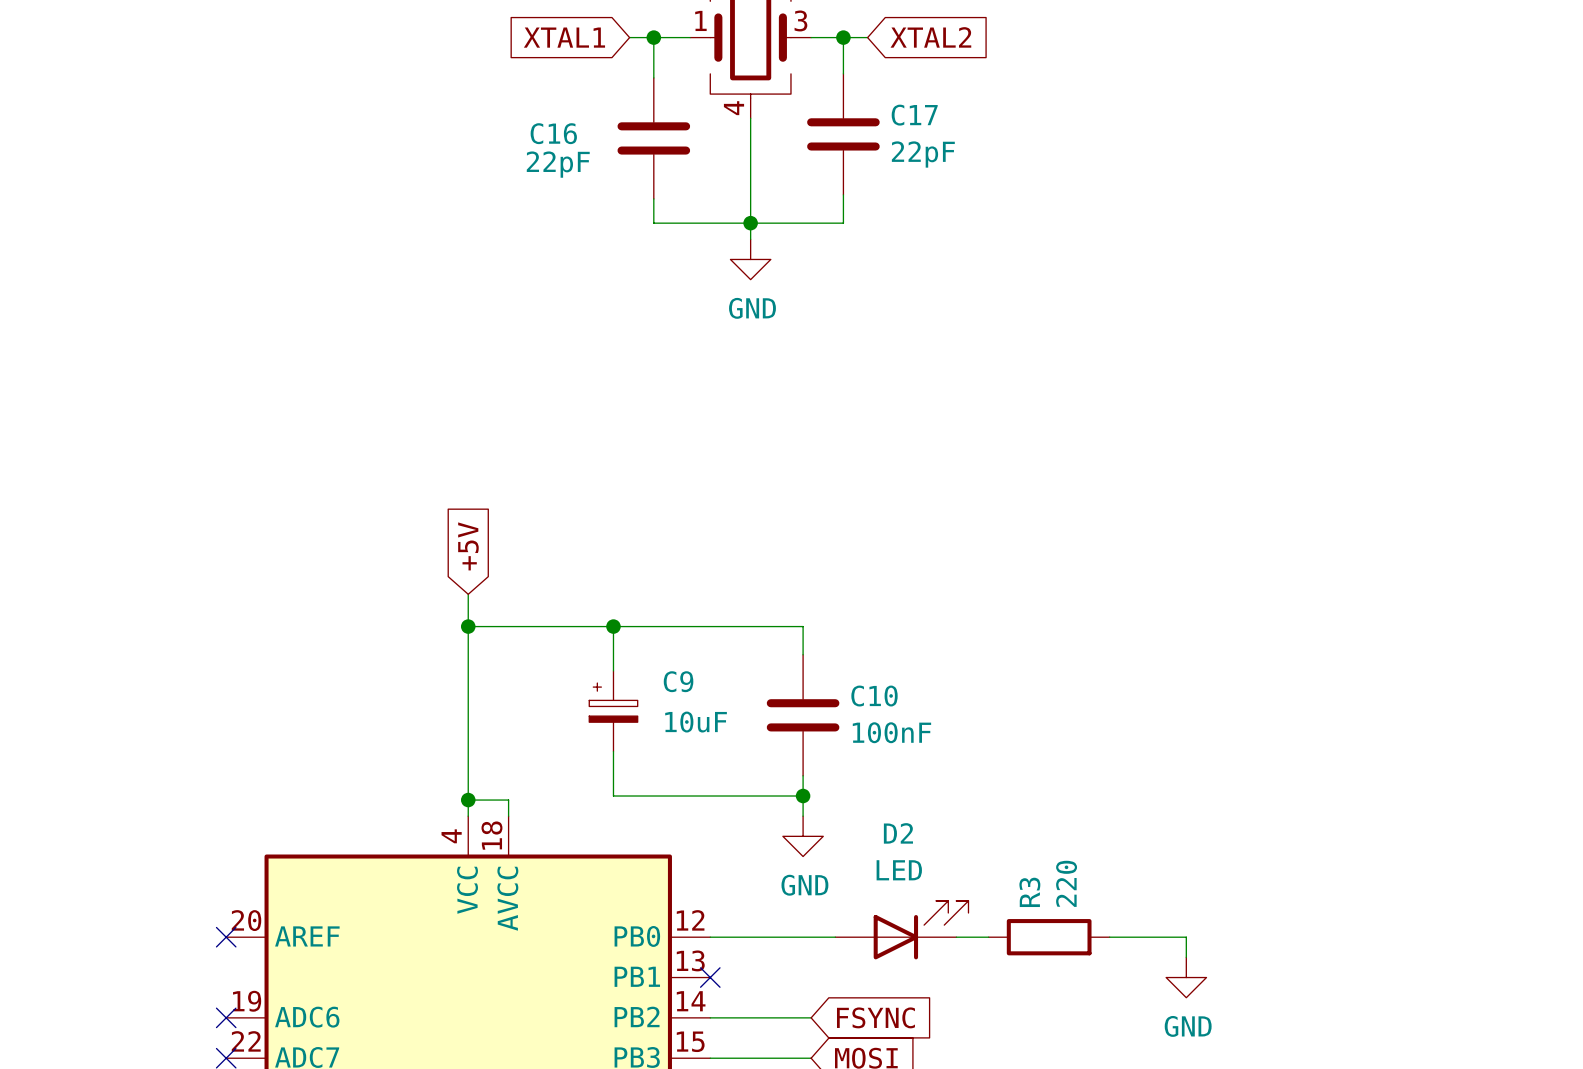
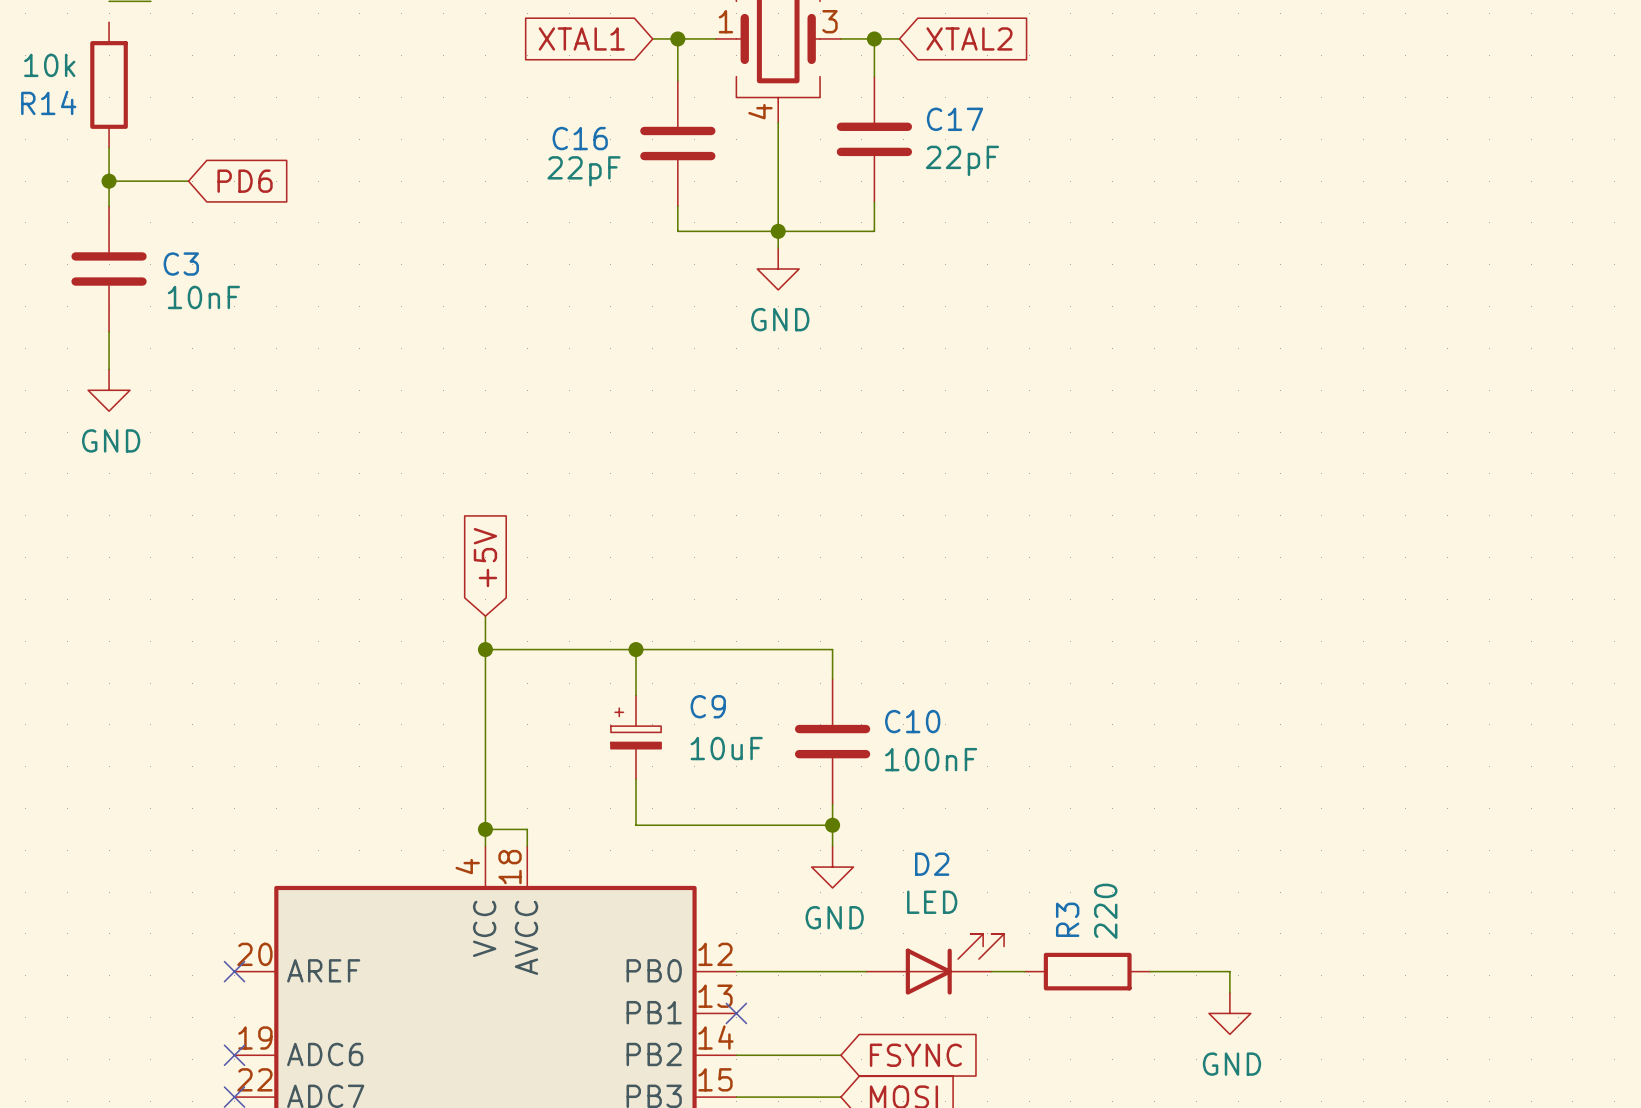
wire: none -> (109, 1) (150, 1)
R14: none -> 10k (109, 84)
wire: none -> (109, 147) (109, 206)
wire: none -> (109, 181) (188, 181)
junction: none -> (109, 181)
global label: none -> PD6 (245, 181)
C3: none -> 10nF (109, 268)
wire: none -> (109, 331) (109, 369)
power symbol: none -> GND (109, 390)

